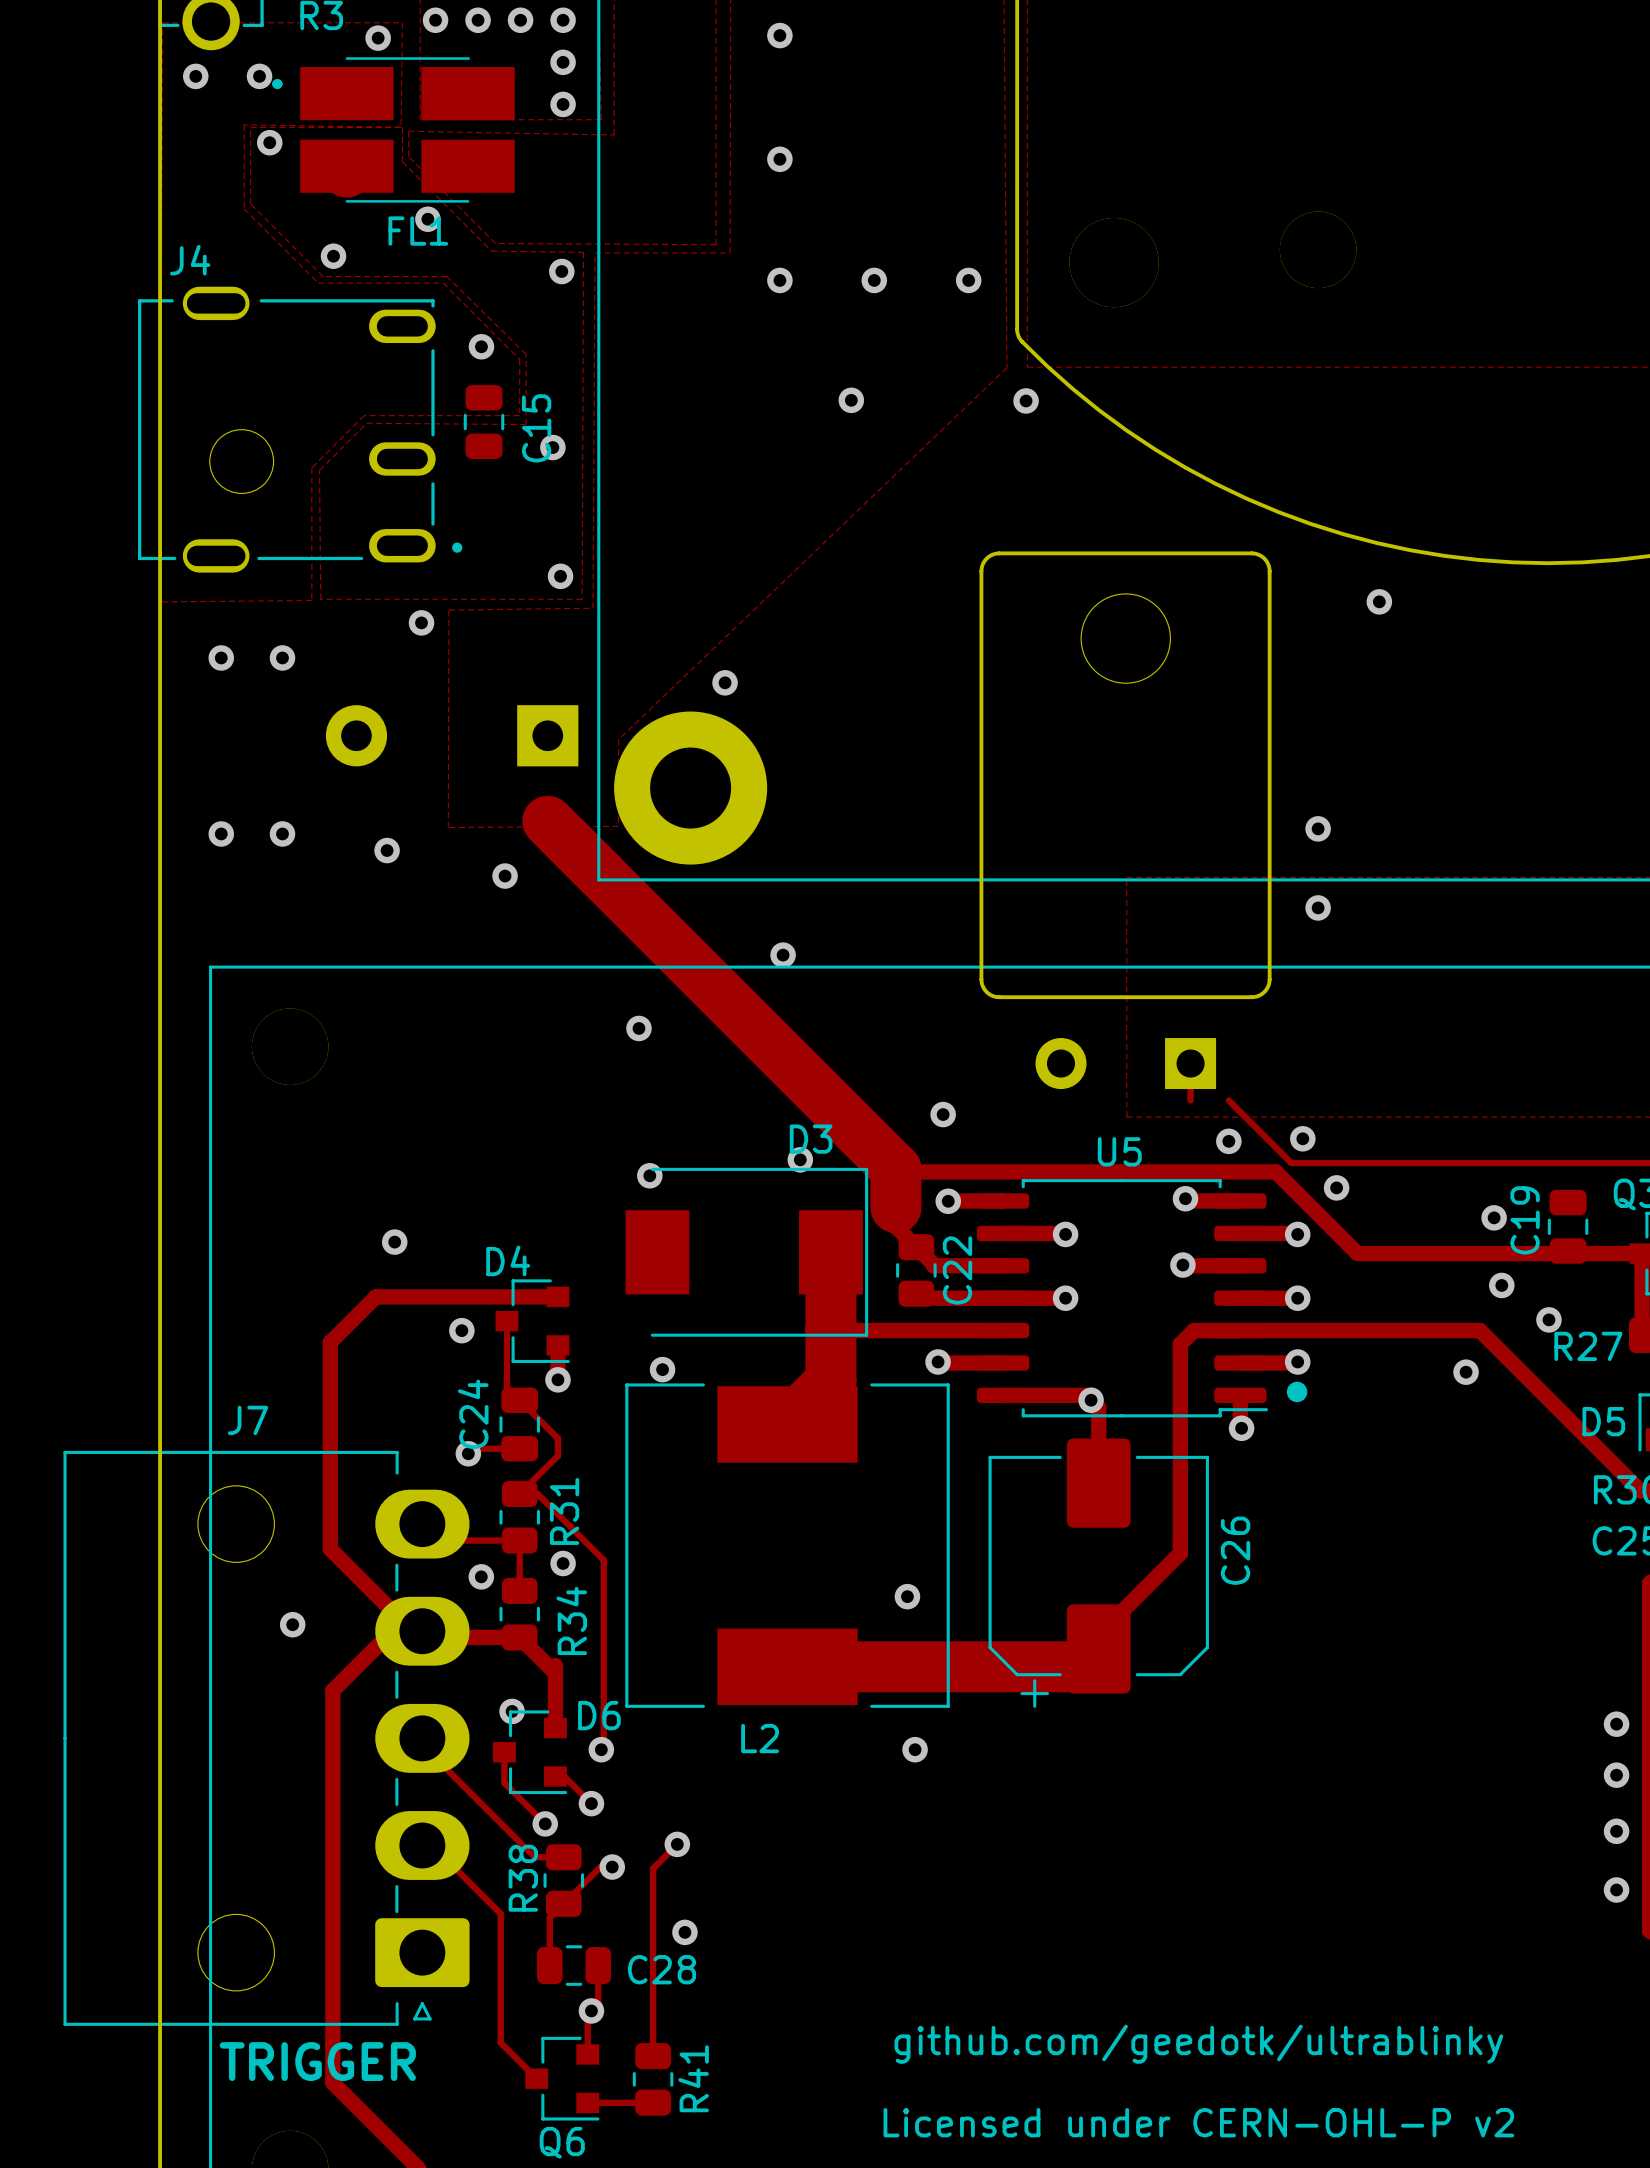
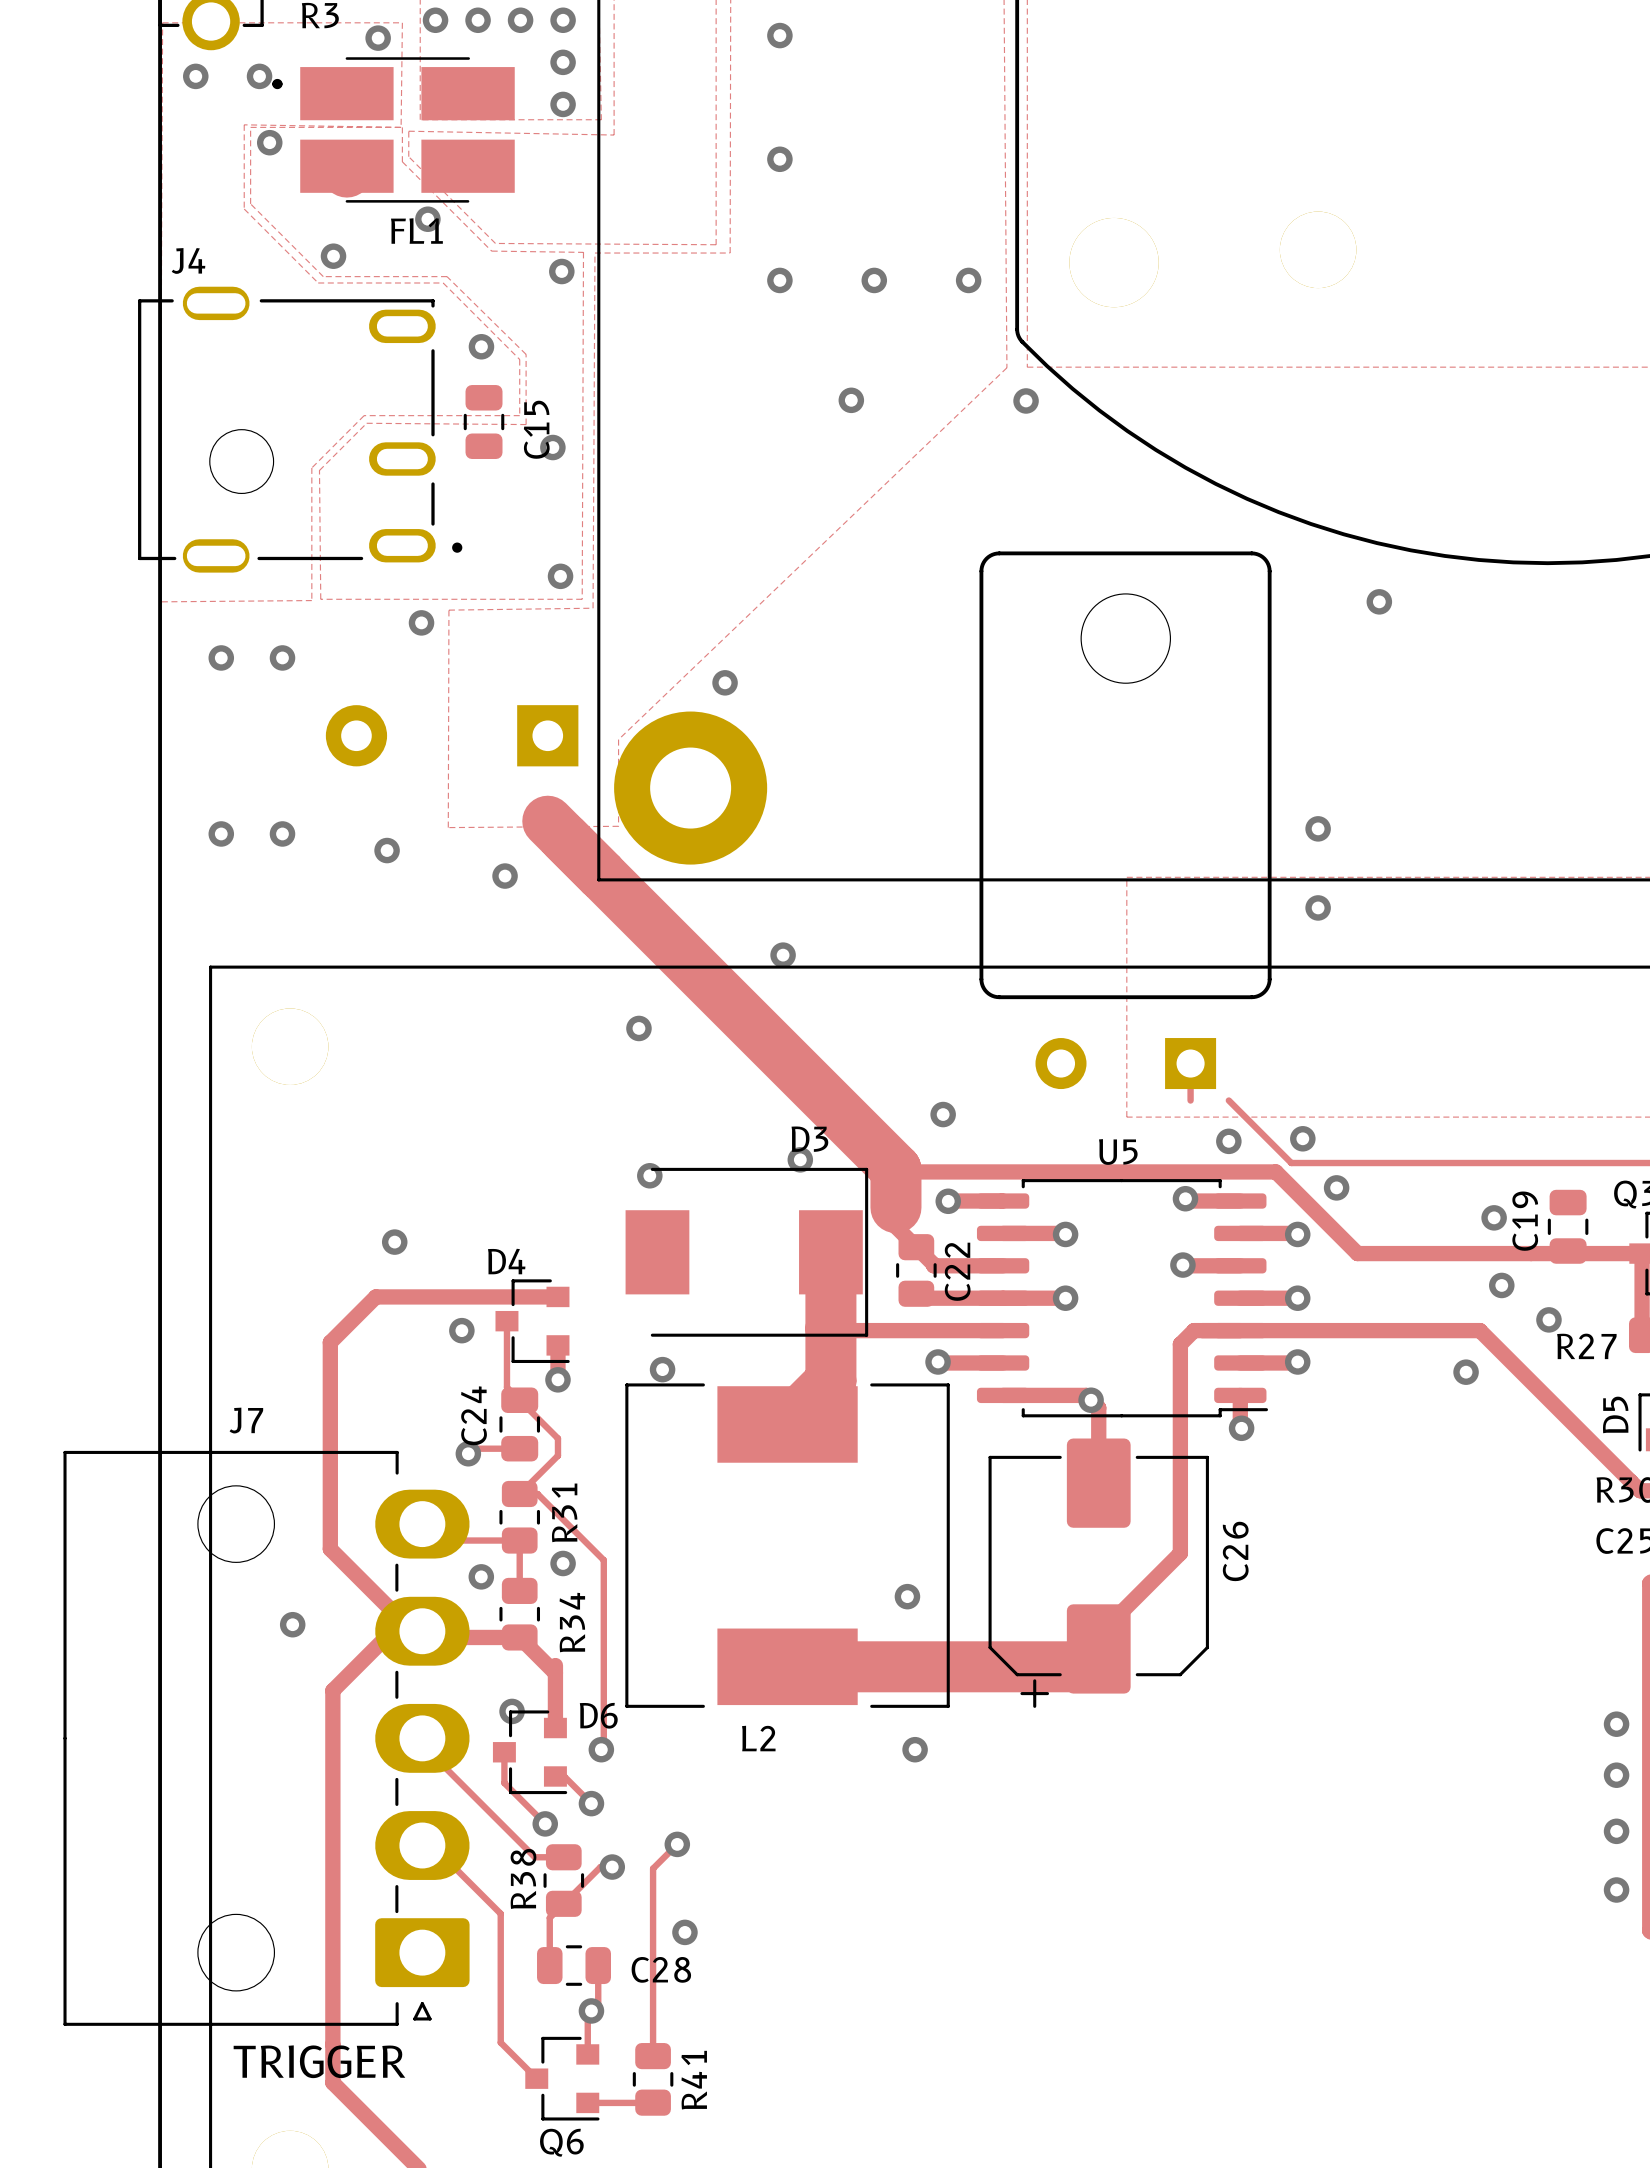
drawing: [1286, 1381, 1308, 1403] -> none
D5 name rotation: 0° (1603, 1421) -> 90° counterclockwise (1615, 1414)
text: github.com/geedotk/ultrablinky (1198, 2044) -> none
text: Licensed under CERN-OHL-P v2 (1198, 2122) -> none

